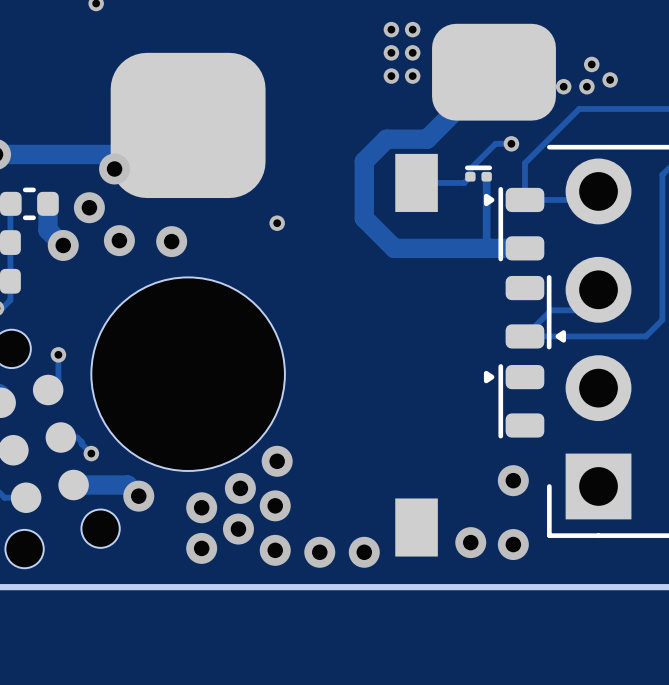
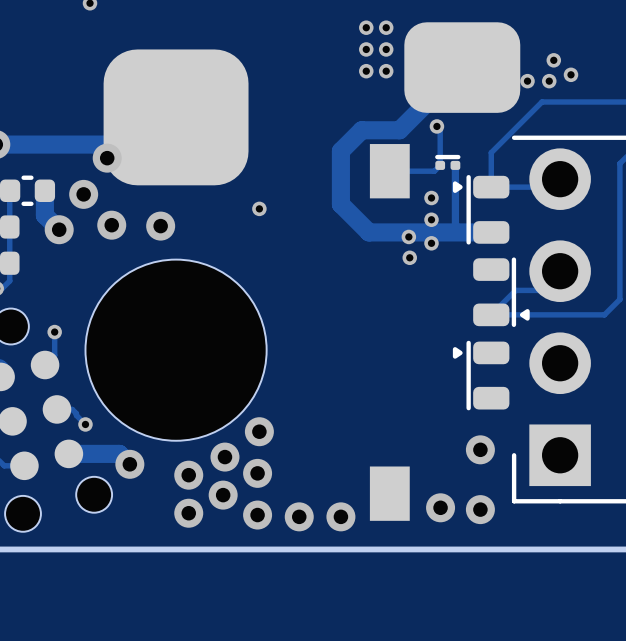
via: none -> (436, 126)
track: (511, 143) (495, 143) (470, 169) -> (436, 126) (440, 129) (440, 158)
via: (511, 143) -> none
via: none -> (431, 198)
via: none -> (431, 219)
via: none -> (408, 236)
via: none -> (431, 243)
via: none -> (409, 257)

